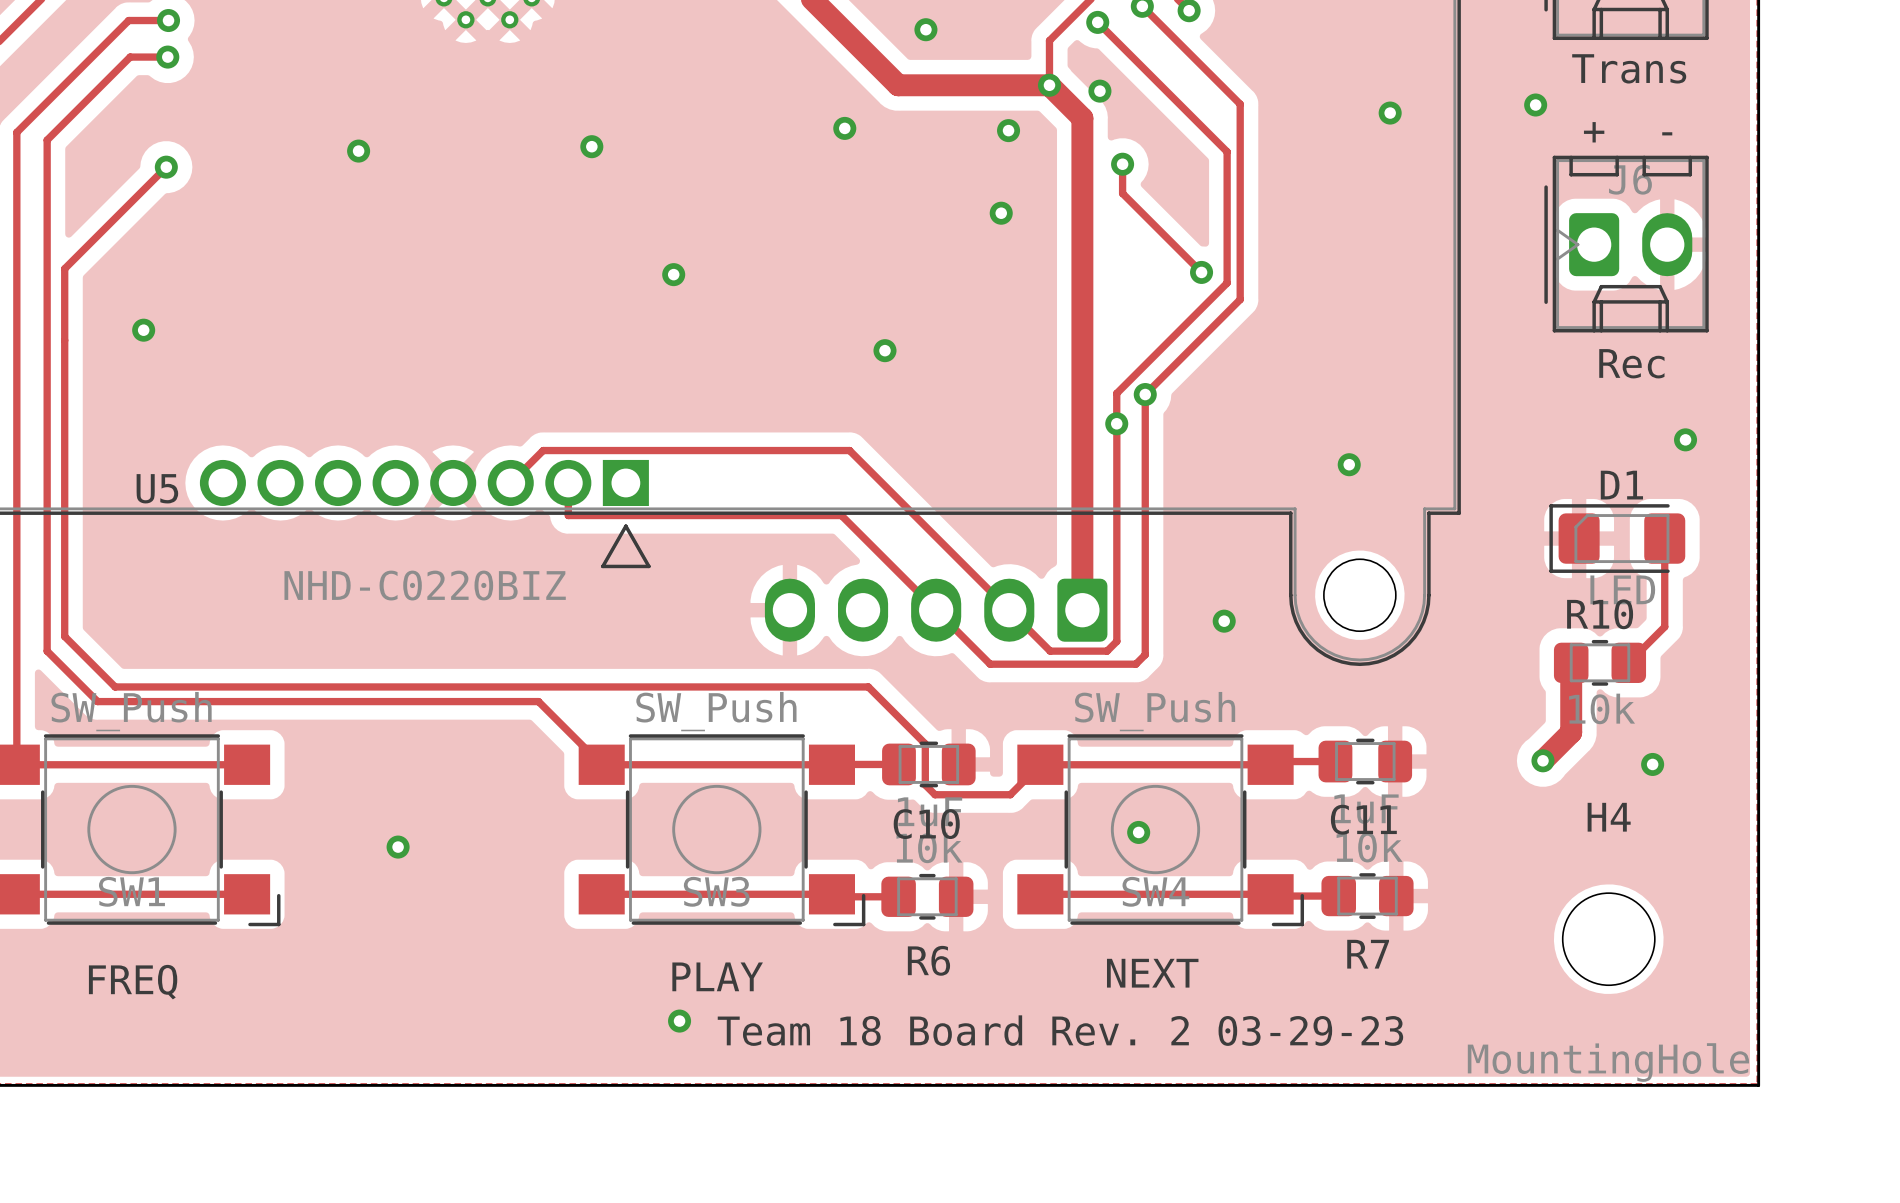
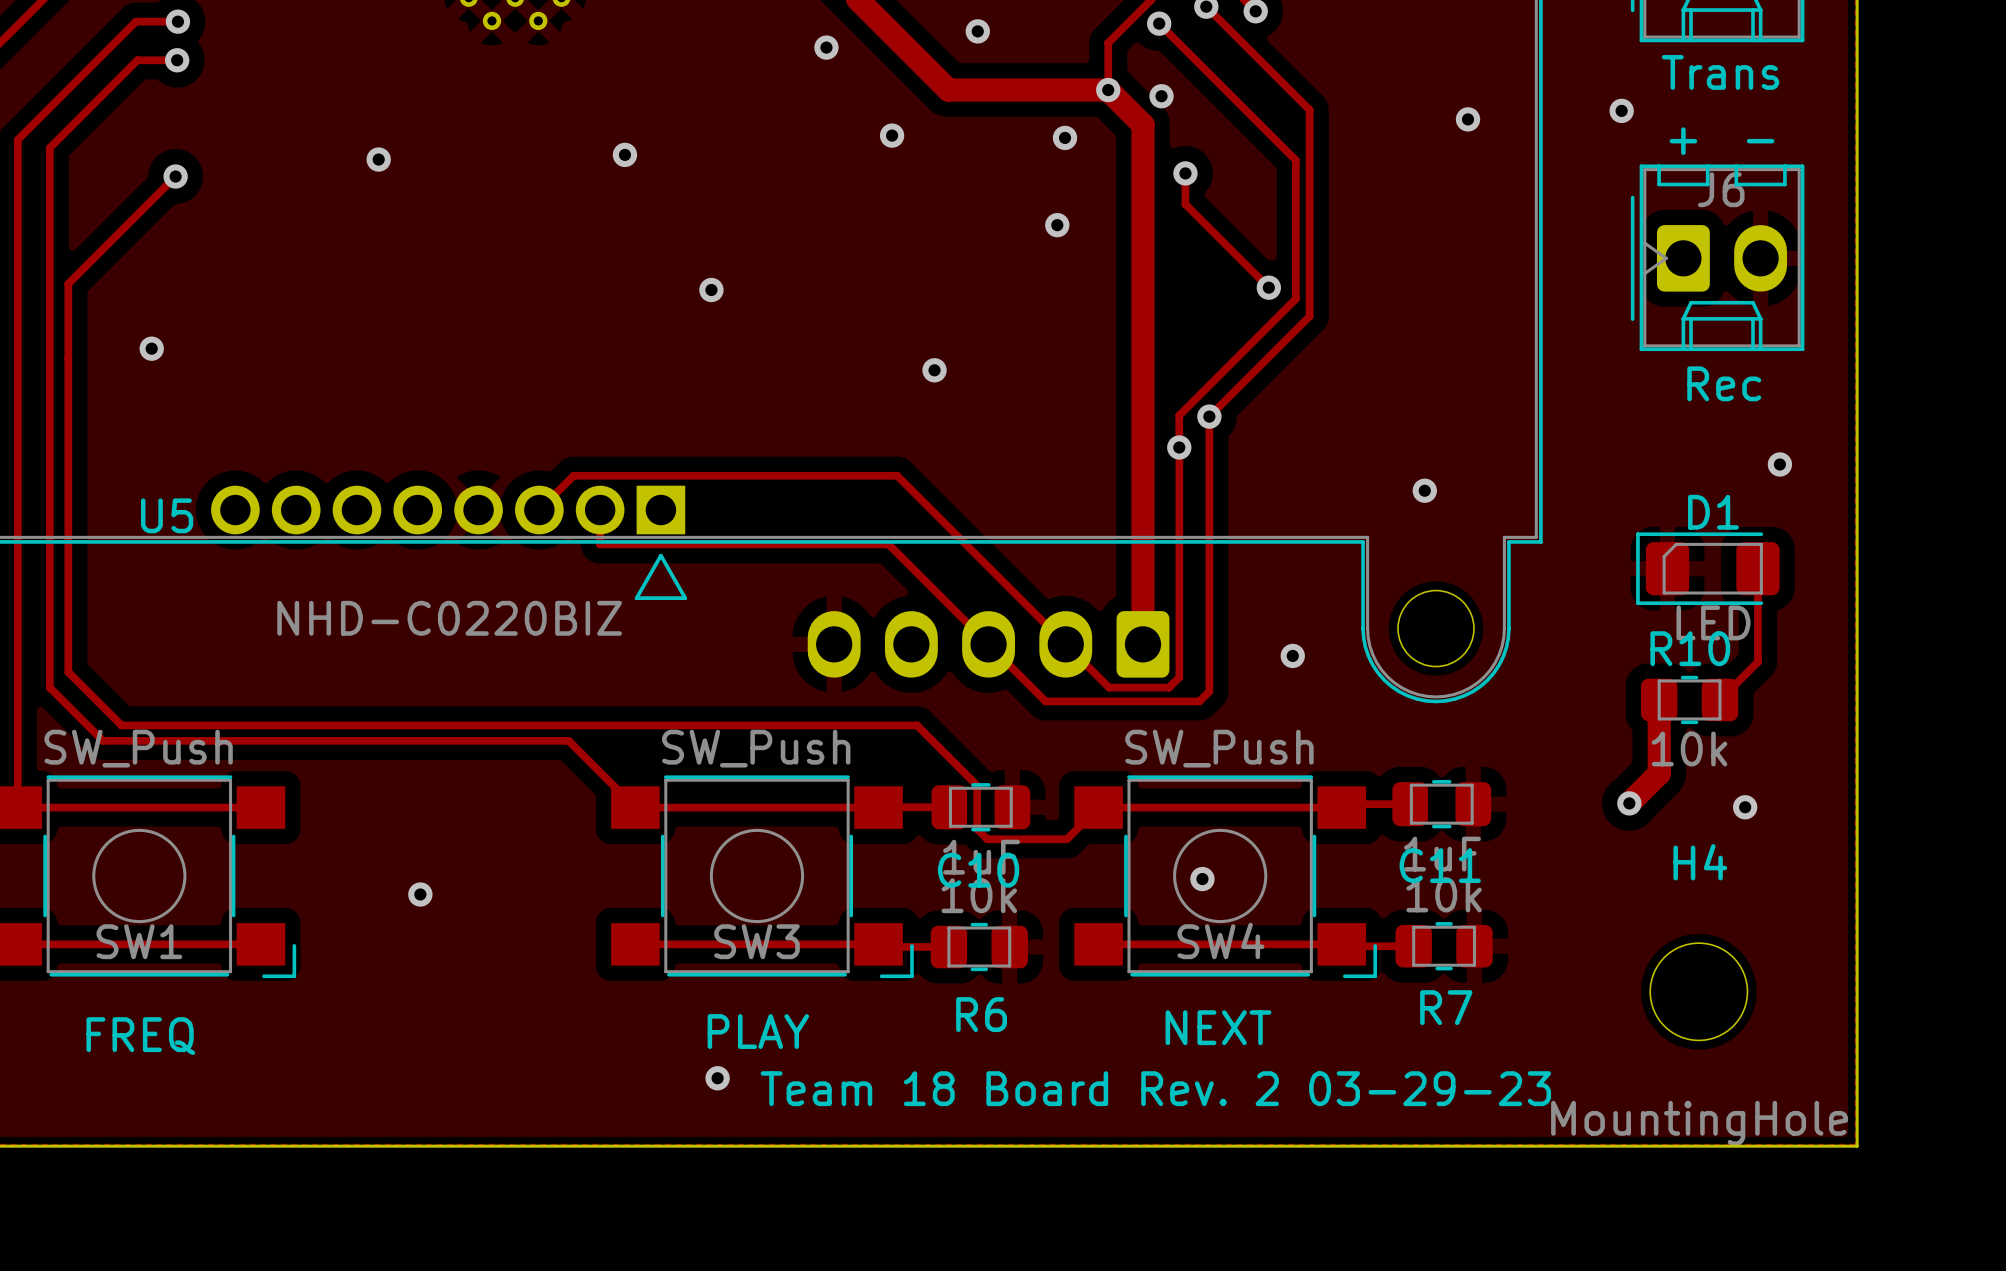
via: none -> (826, 47)

